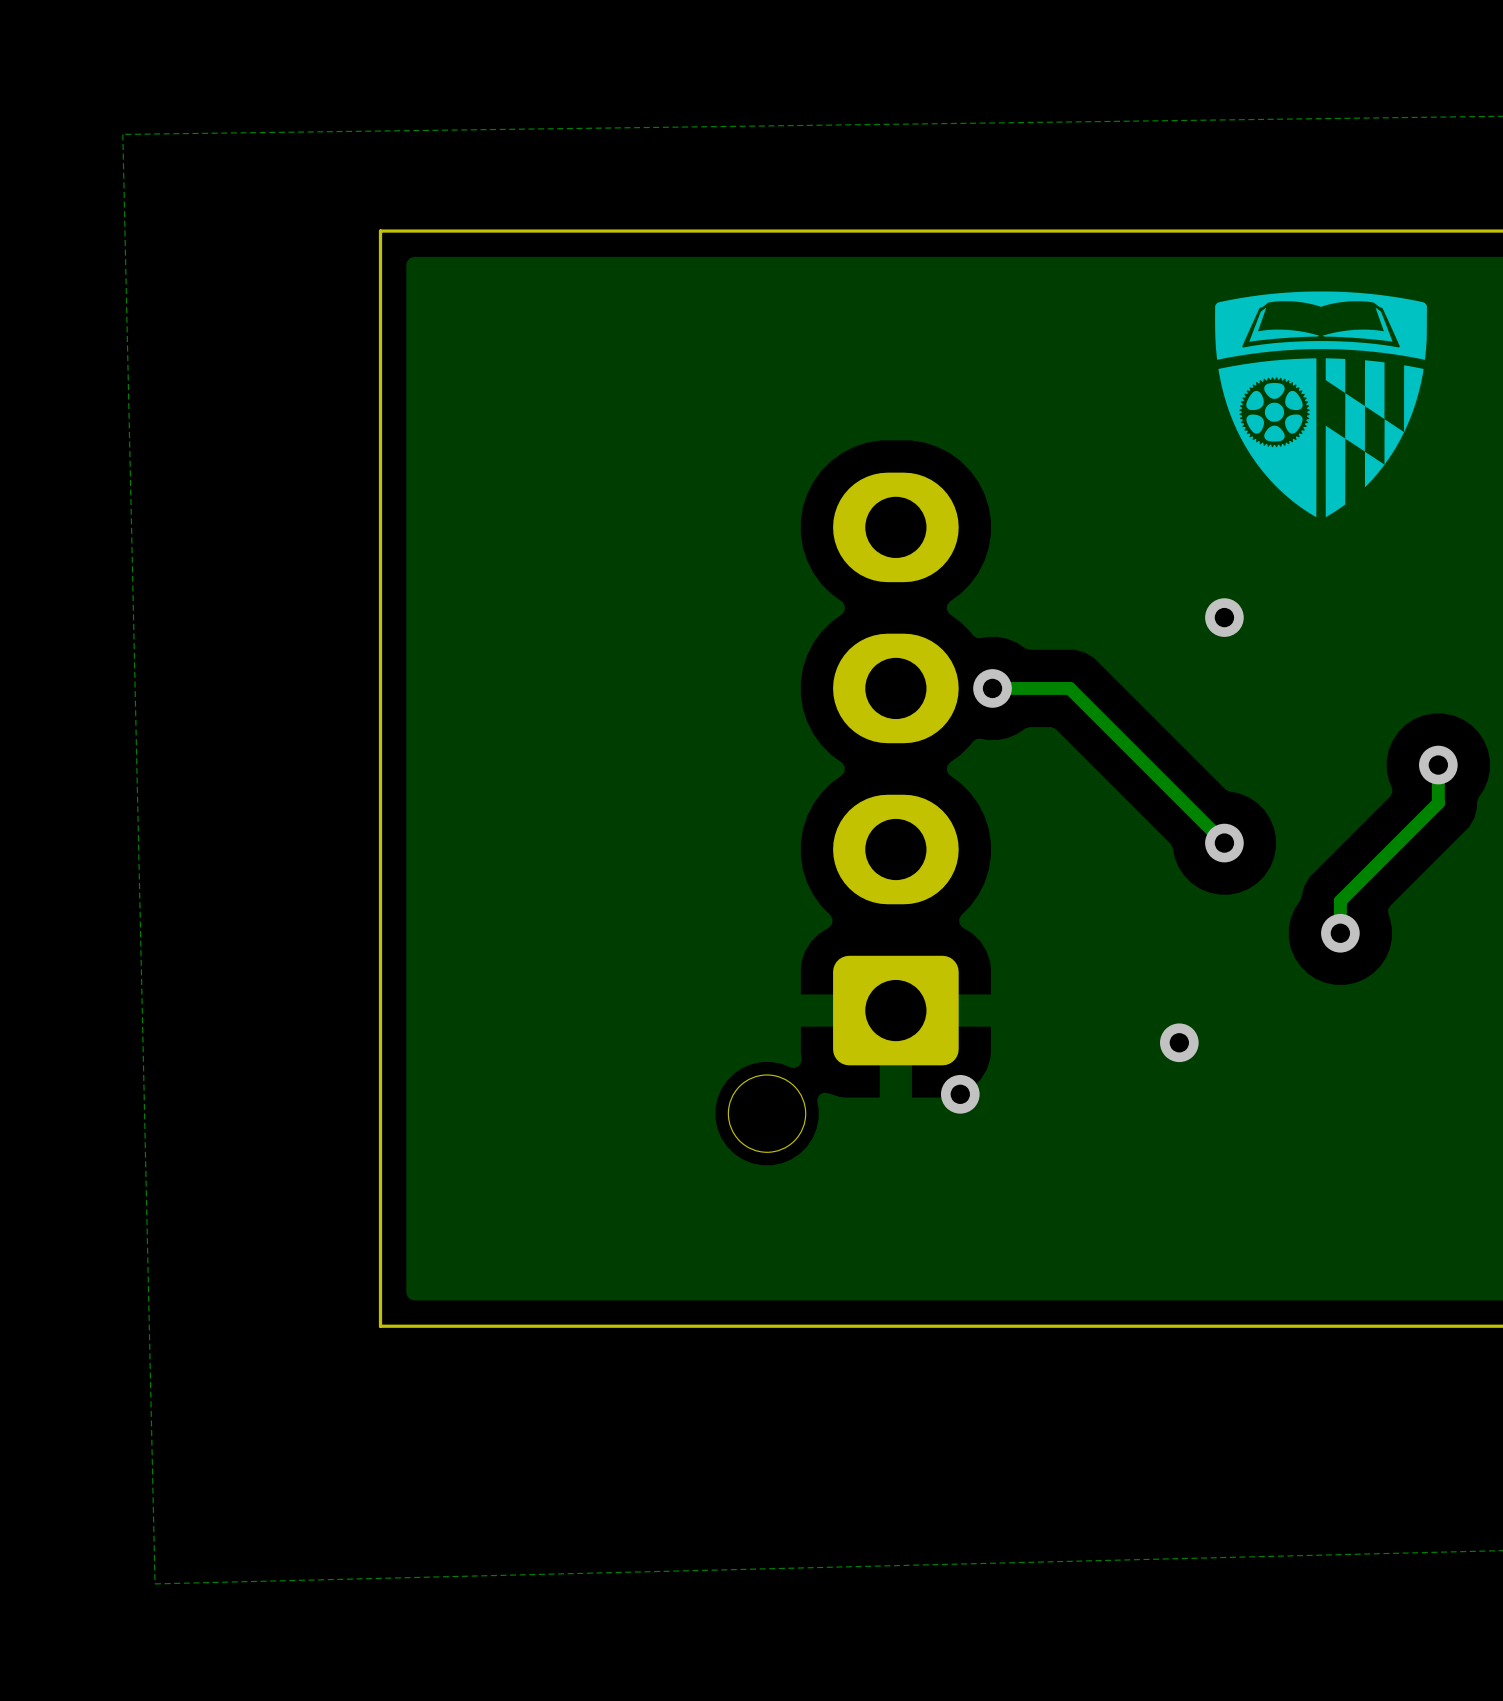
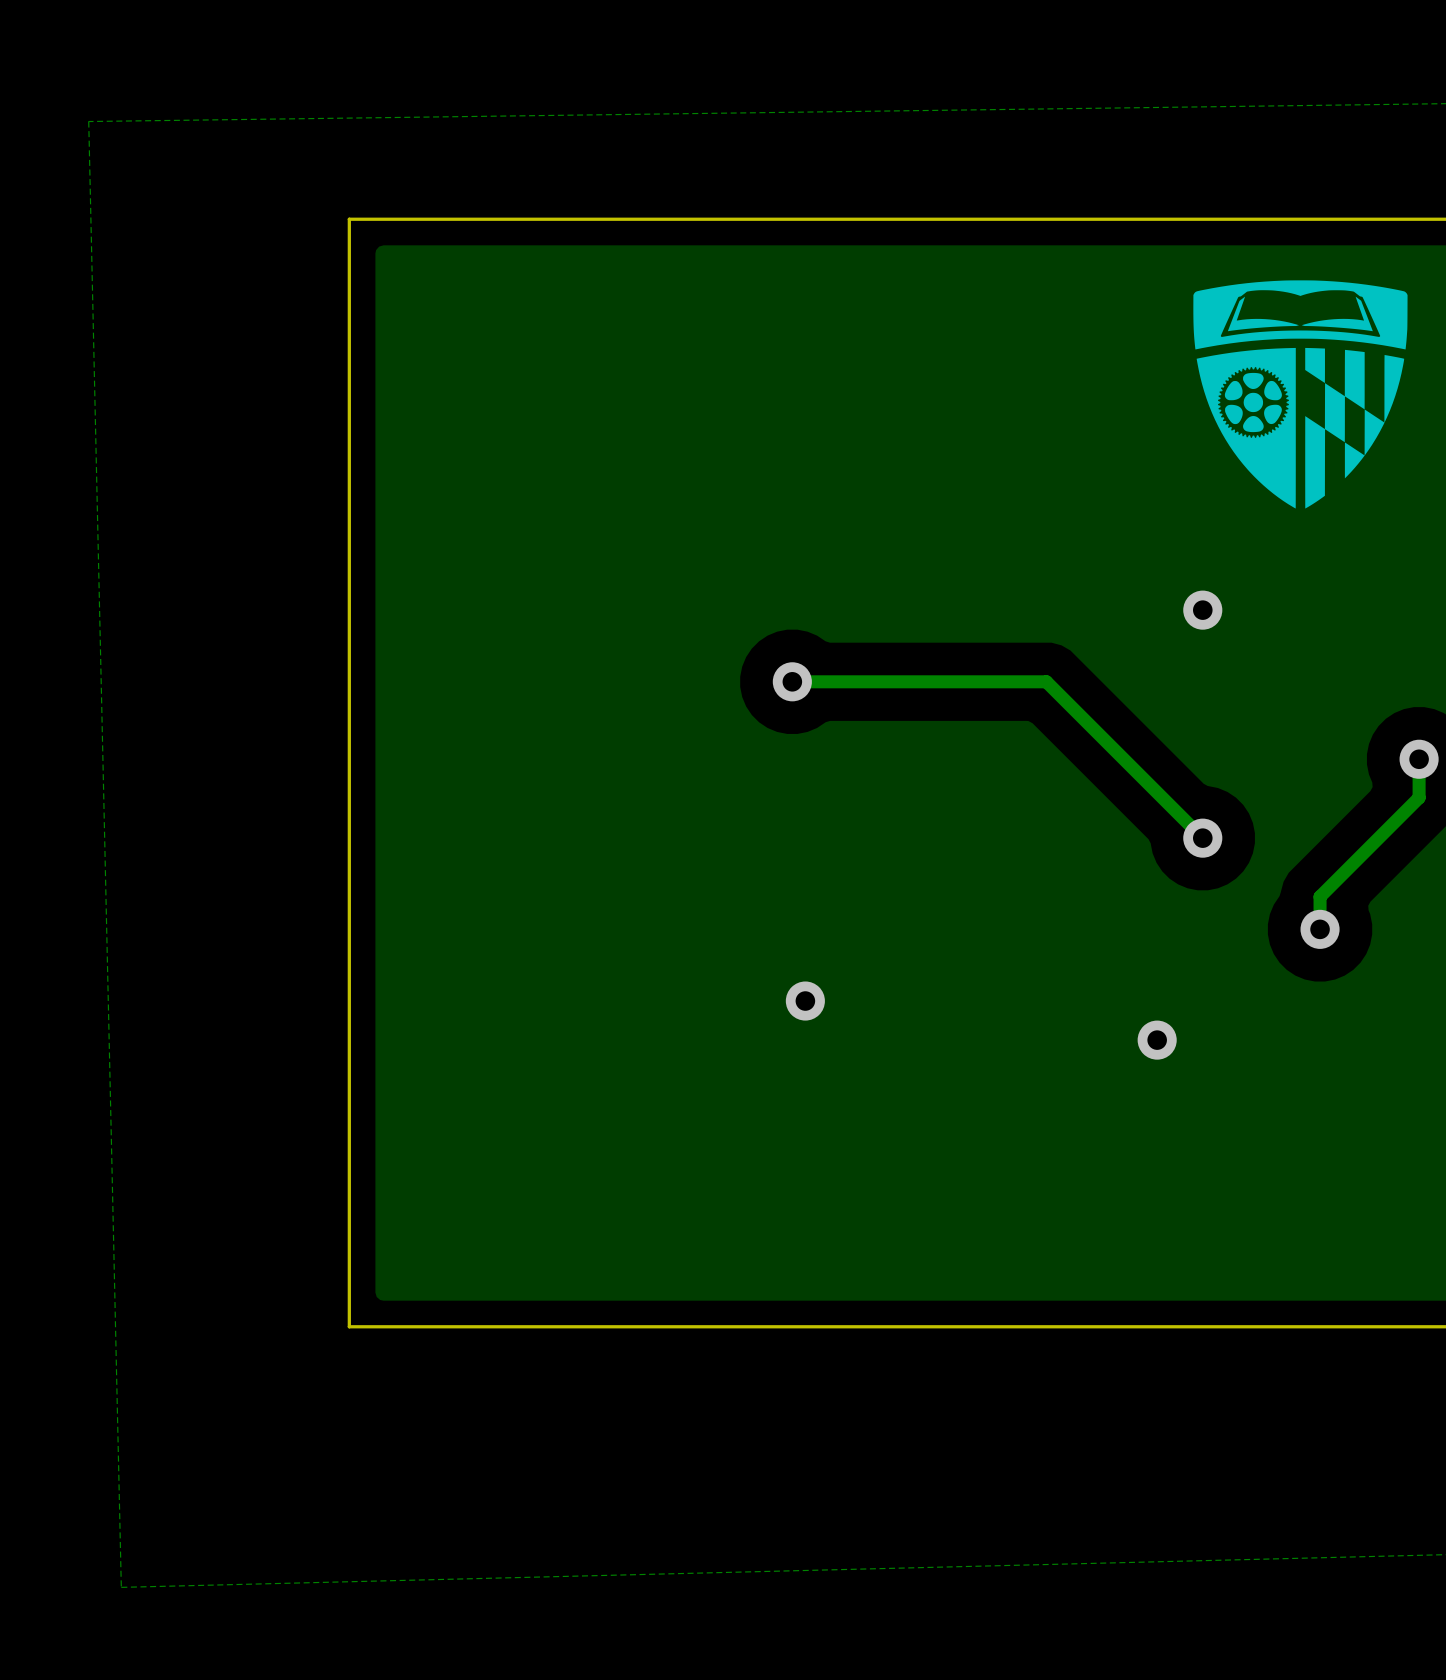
track: none -> (968, 681) (792, 681)
via position: (992, 688) -> (792, 681)
part: (843, 812) -> none
via position: (960, 1094) -> (805, 1001)

